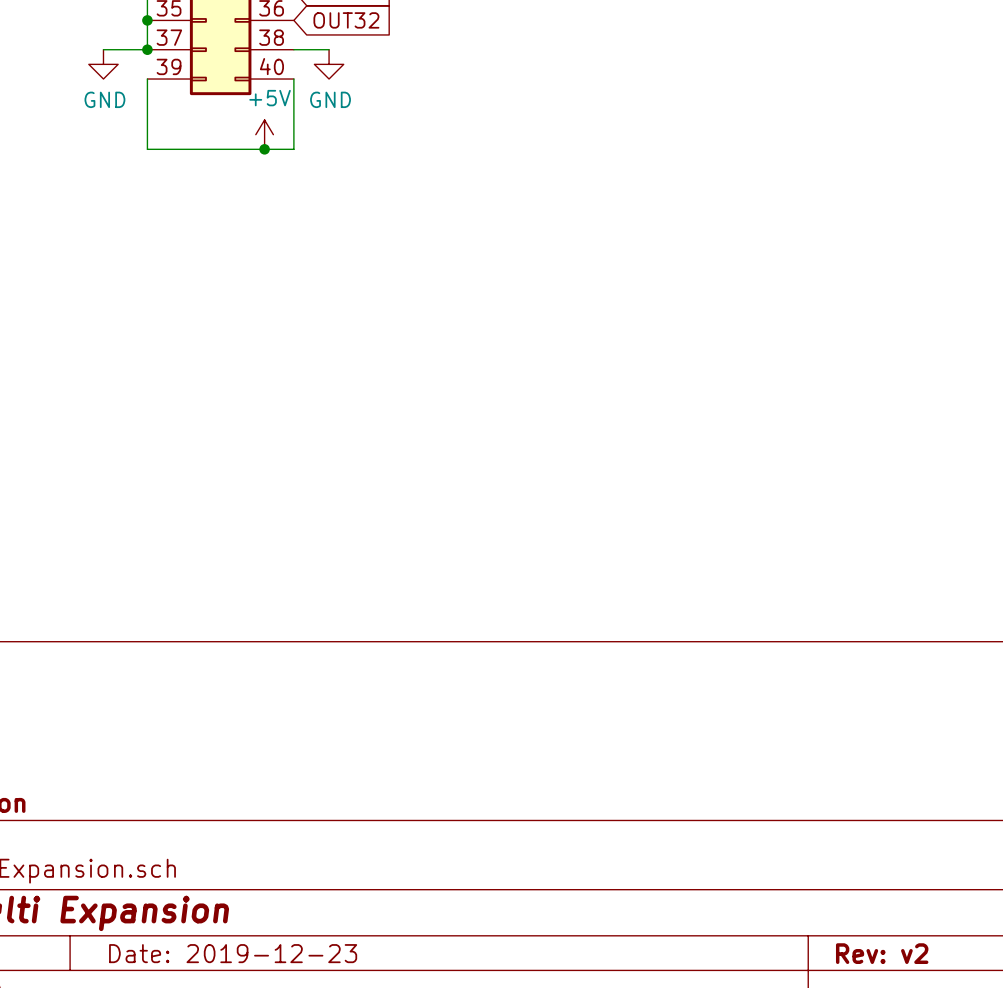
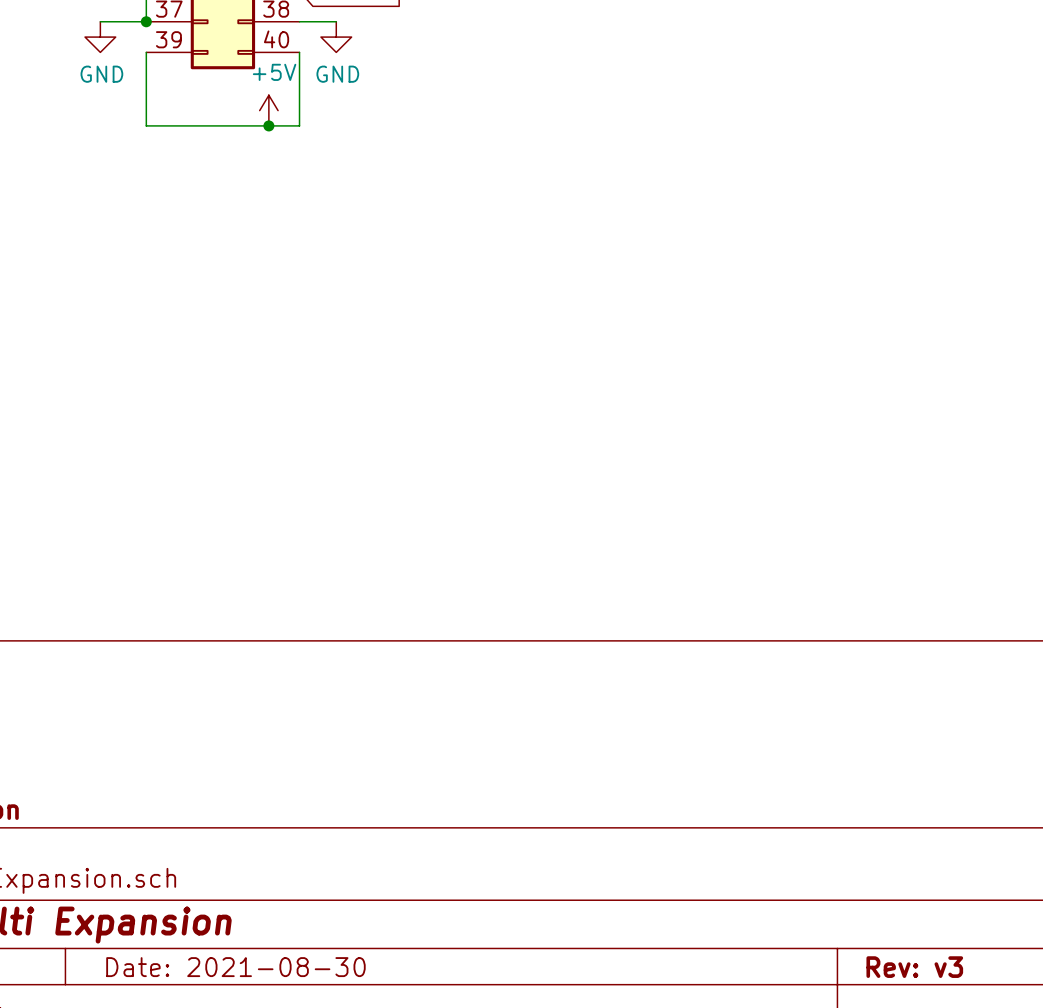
title block: Date: 2019-12-23 (233, 953) -> Date: 2021-08-30 (235, 967)
title block: Rev: v2 (882, 953) -> Rev: v3 (914, 967)

